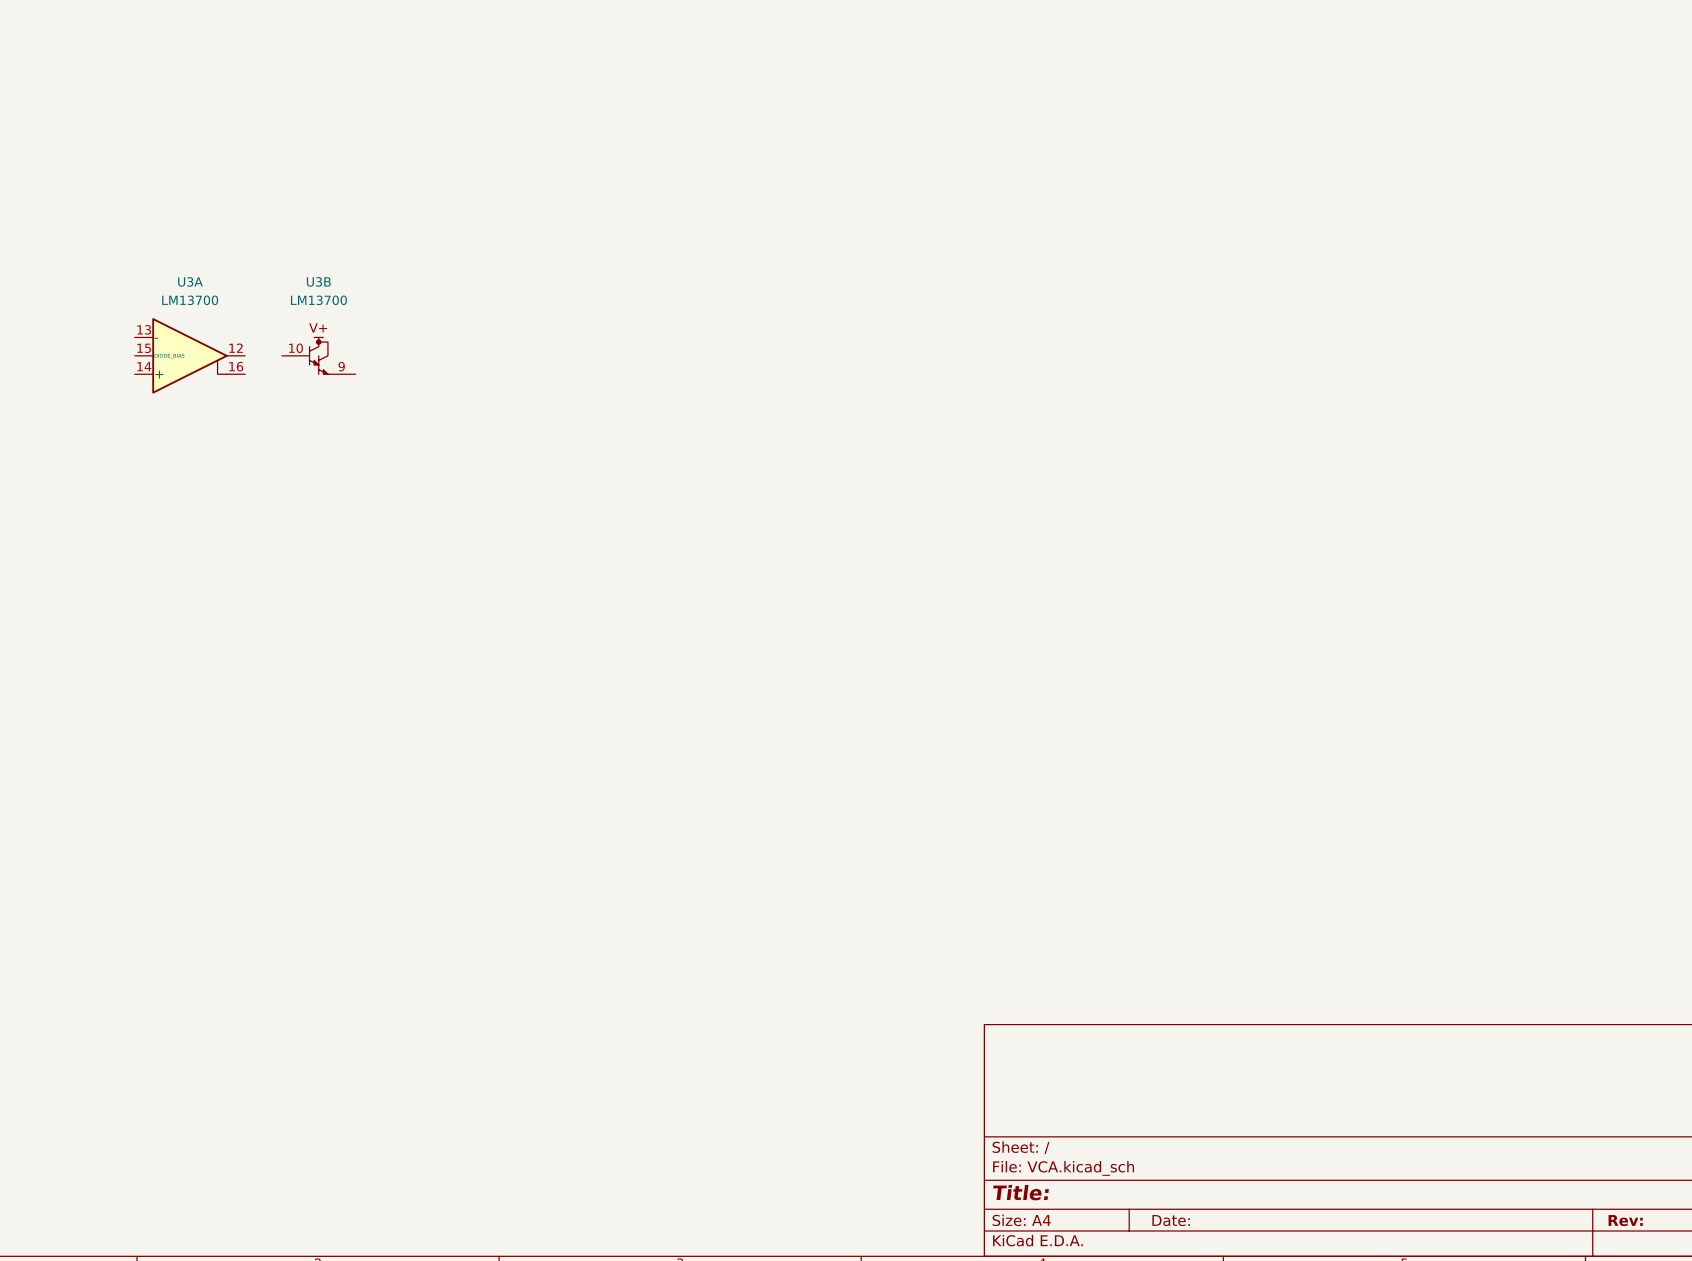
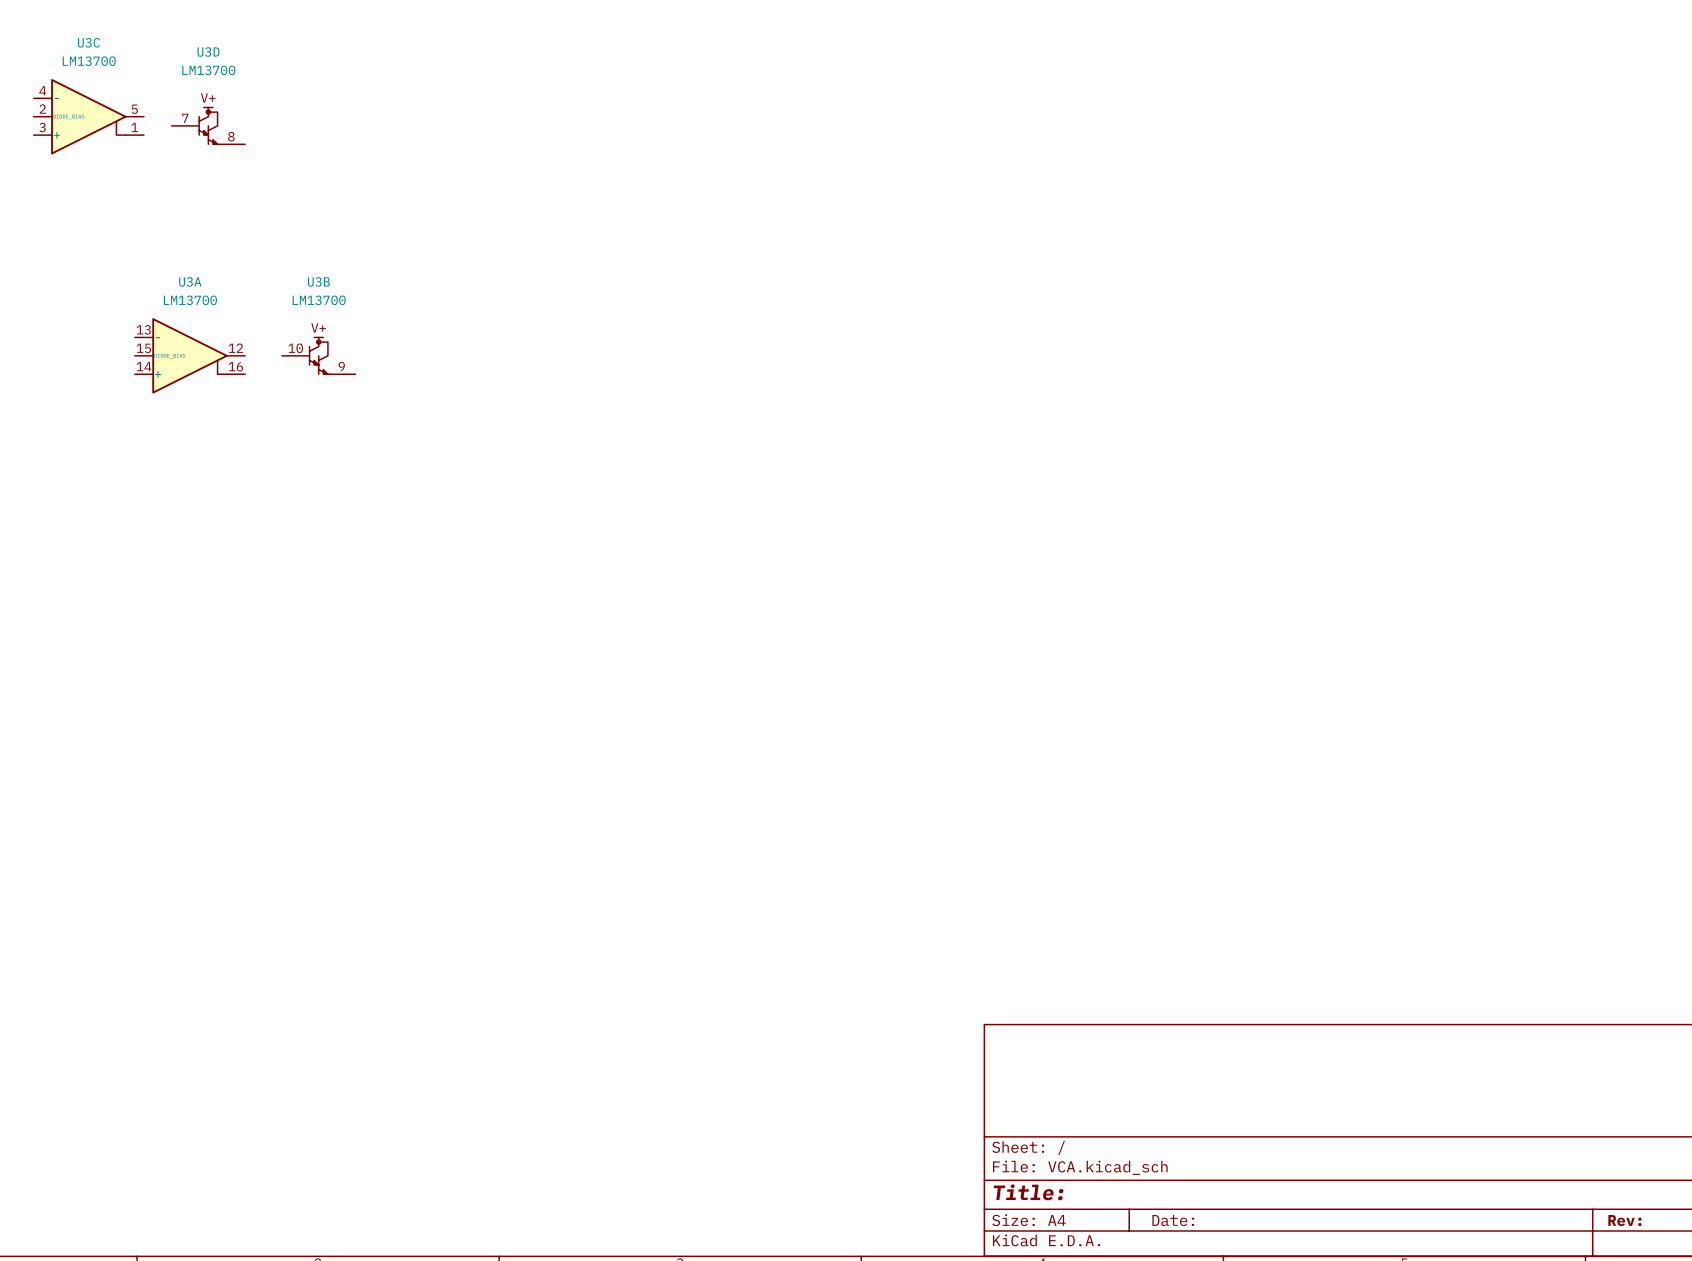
U3C: none -> LM13700 (88, 116)
U3D: none -> LM13700 (208, 125)

